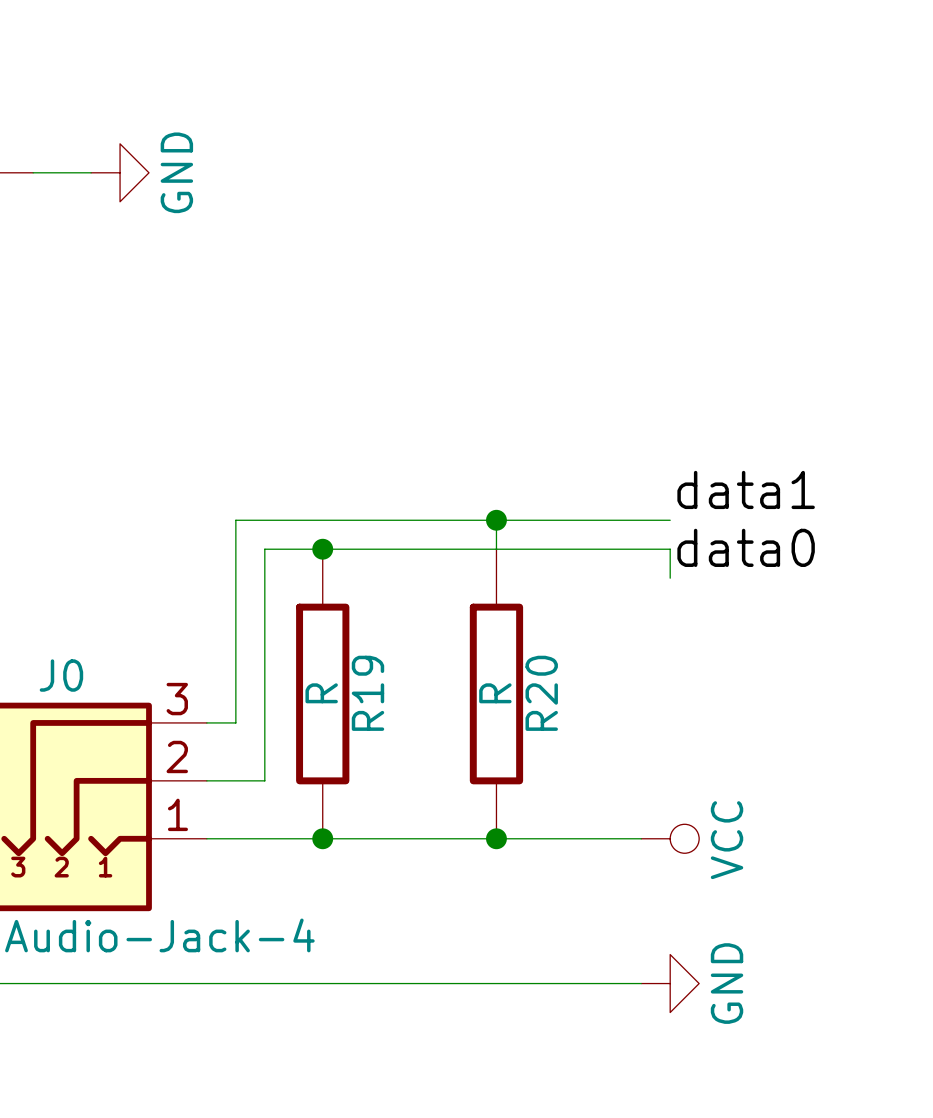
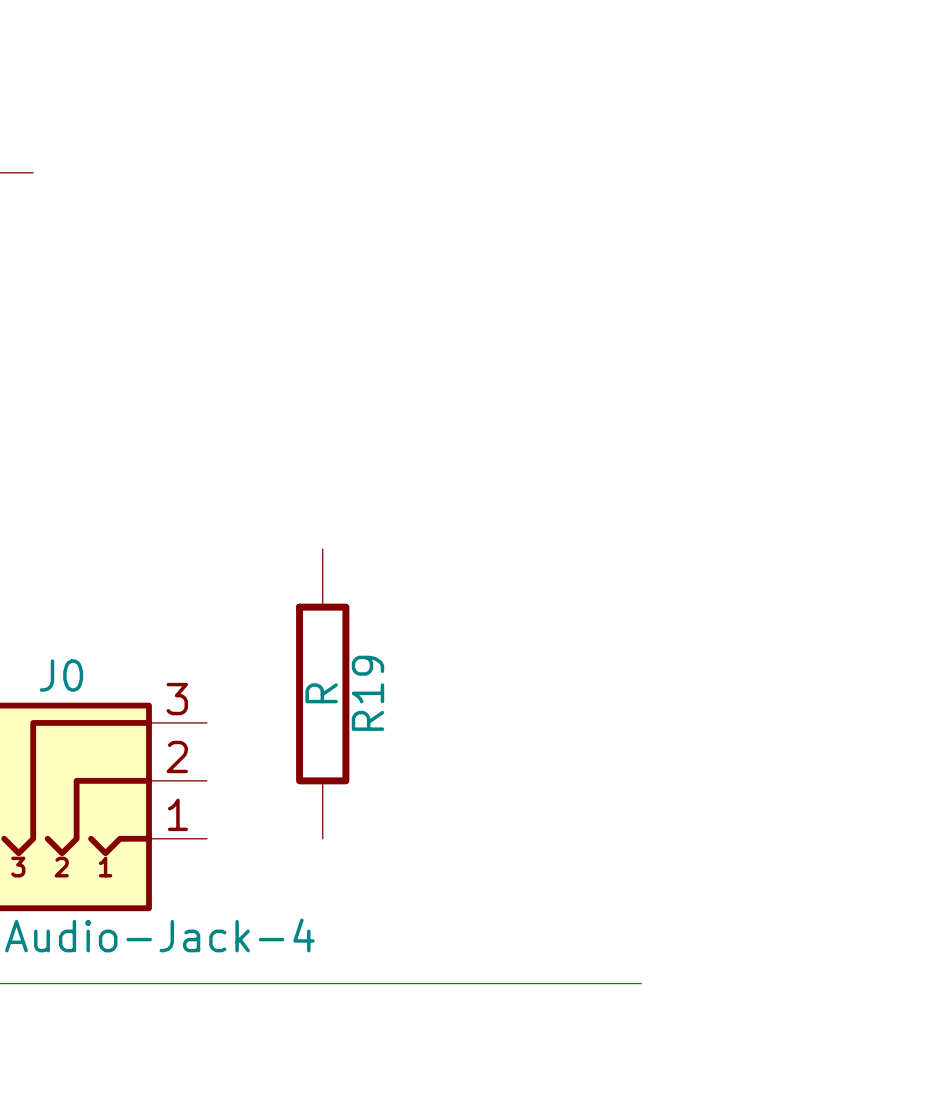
wire: (33, 172) (91, 172) -> none
power symbol: GND (120, 172) -> none
label: data1 (746, 489) -> none
wire: (496, 520) (496, 549) -> none
junction: (496, 520) -> none
wire: (670, 520) (235, 520) (235, 722) (206, 722) -> none
label: data0 (746, 547) -> none
junction: (322, 549) -> none
wire: (670, 578) (670, 549) (264, 549) (264, 780) (206, 780) -> none
R20: R (496, 694) -> none
wire: (206, 838) (641, 838) -> none
junction: (322, 838) -> none
junction: (496, 838) -> none
power symbol: VCC (670, 838) -> none
power symbol: GND (670, 983) -> none

